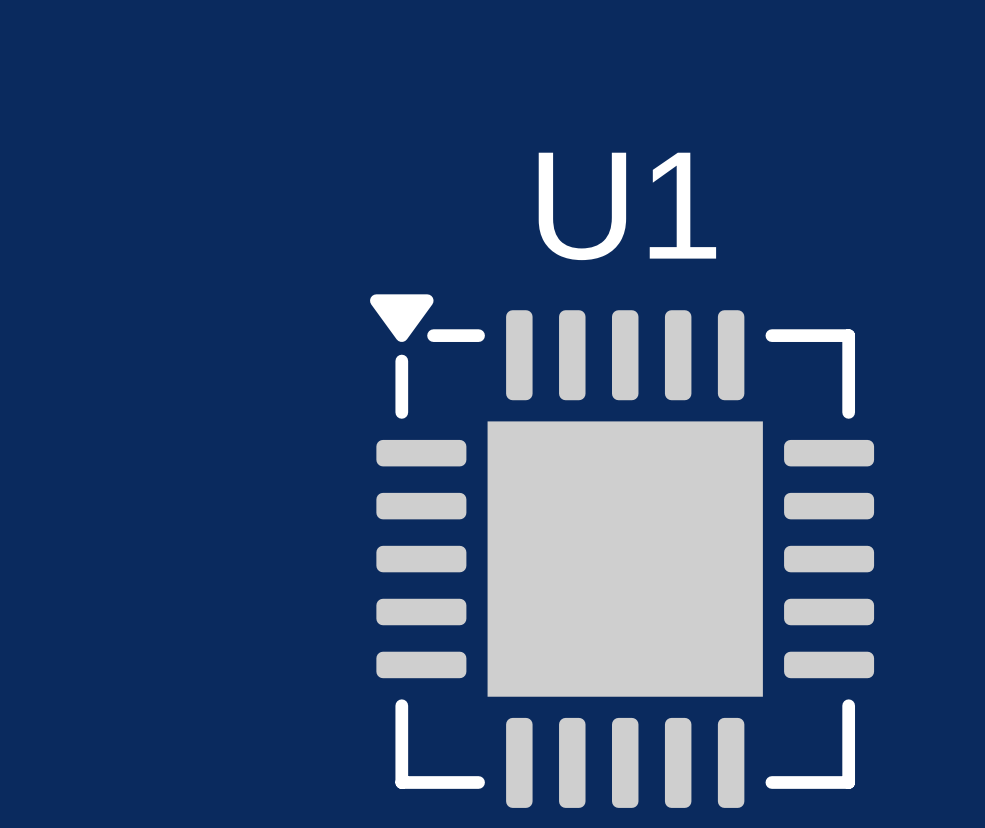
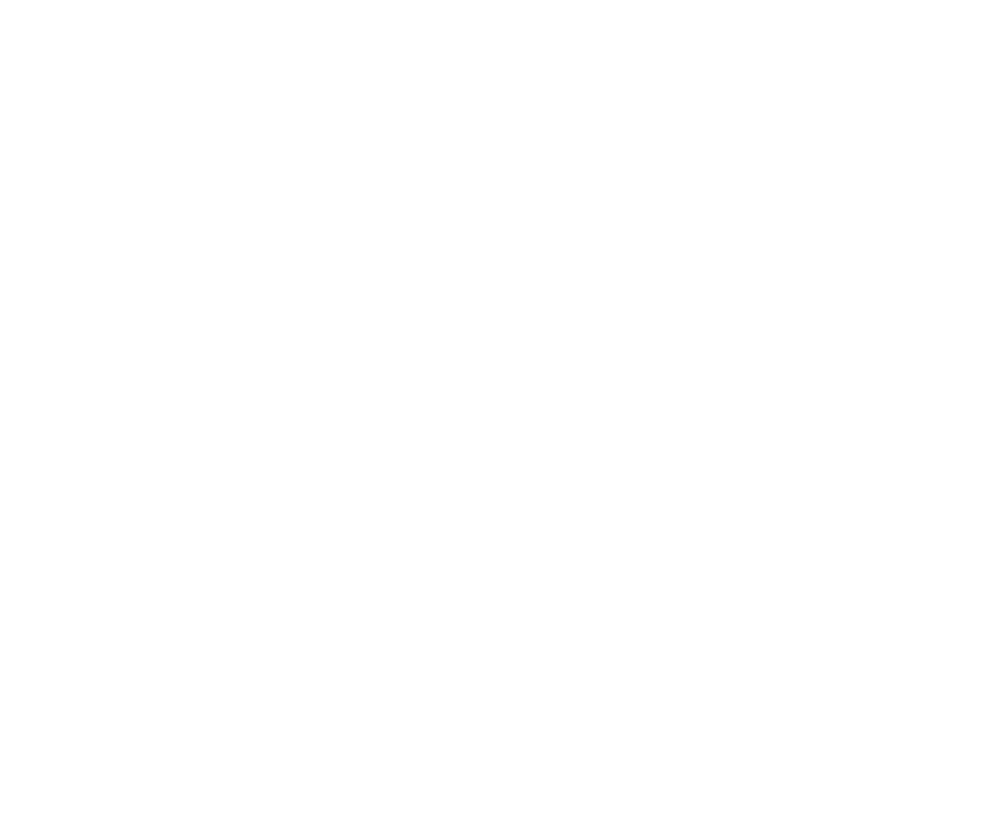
U1: (622, 551) -> none

